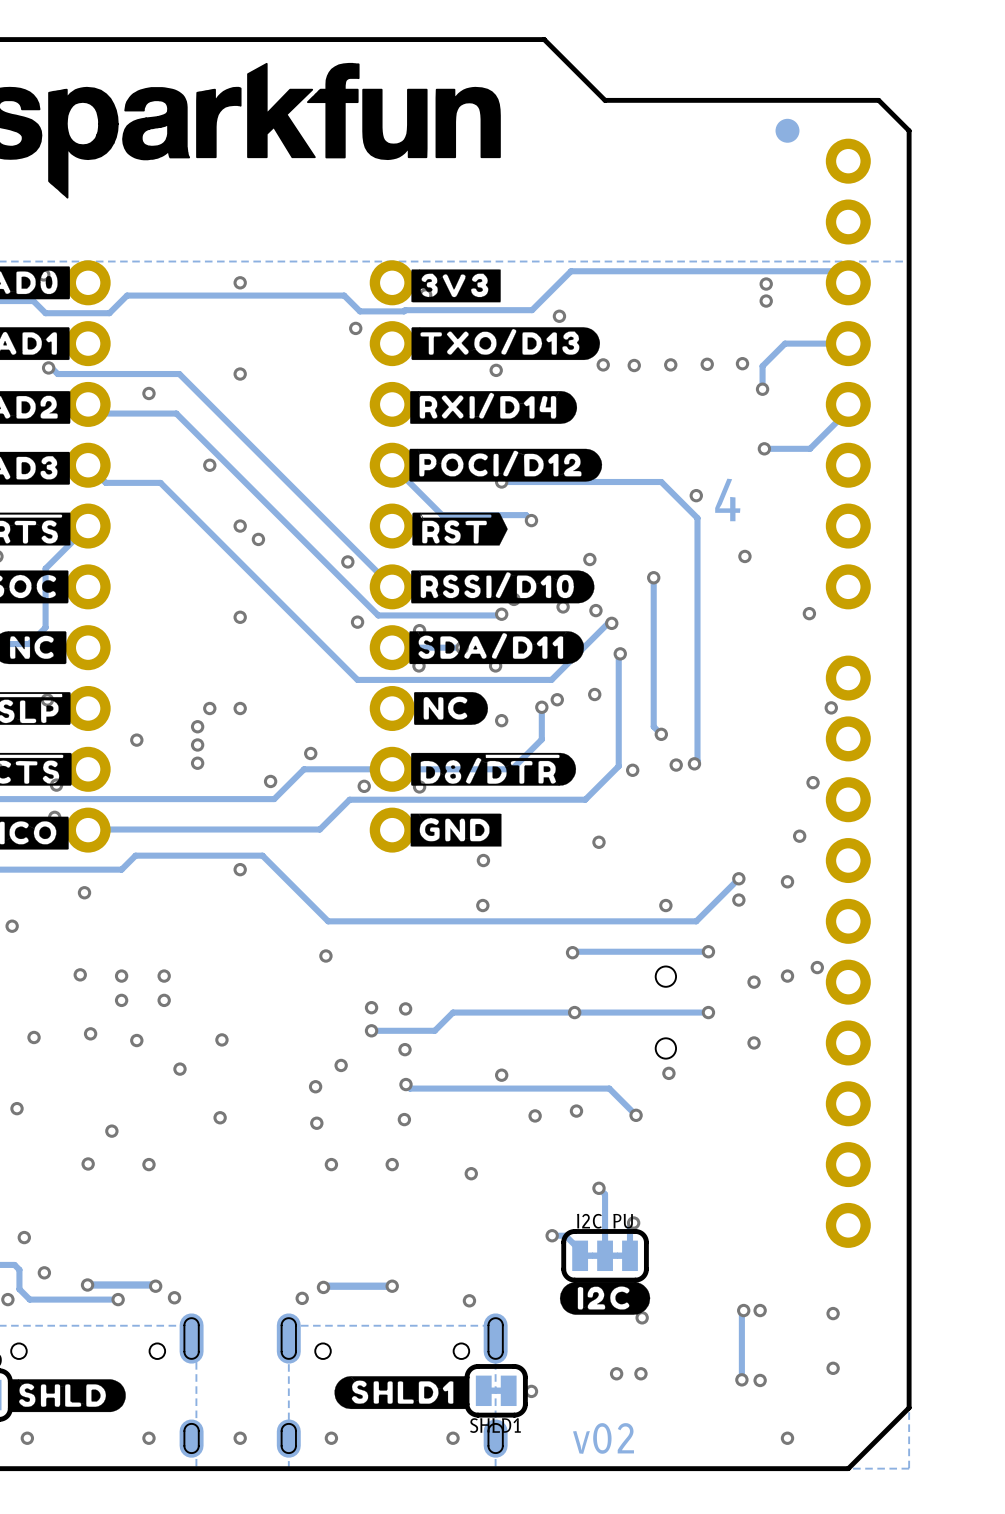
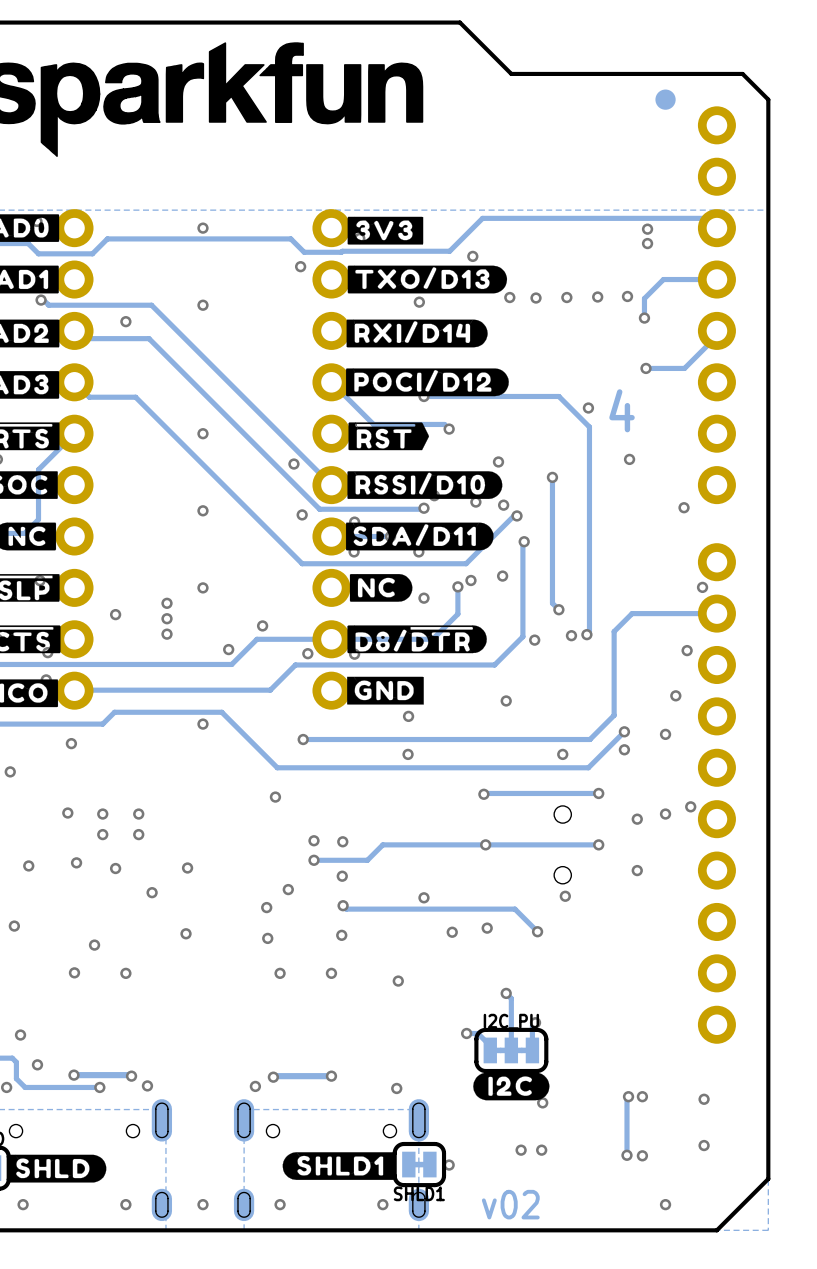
via: (209, 465) -> none
via: (258, 539) -> none
via: (209, 708) -> none
track: none -> (716, 613) (632, 613) (614, 631) (614, 715) (589, 739) (303, 739)
via: none -> (303, 739)

